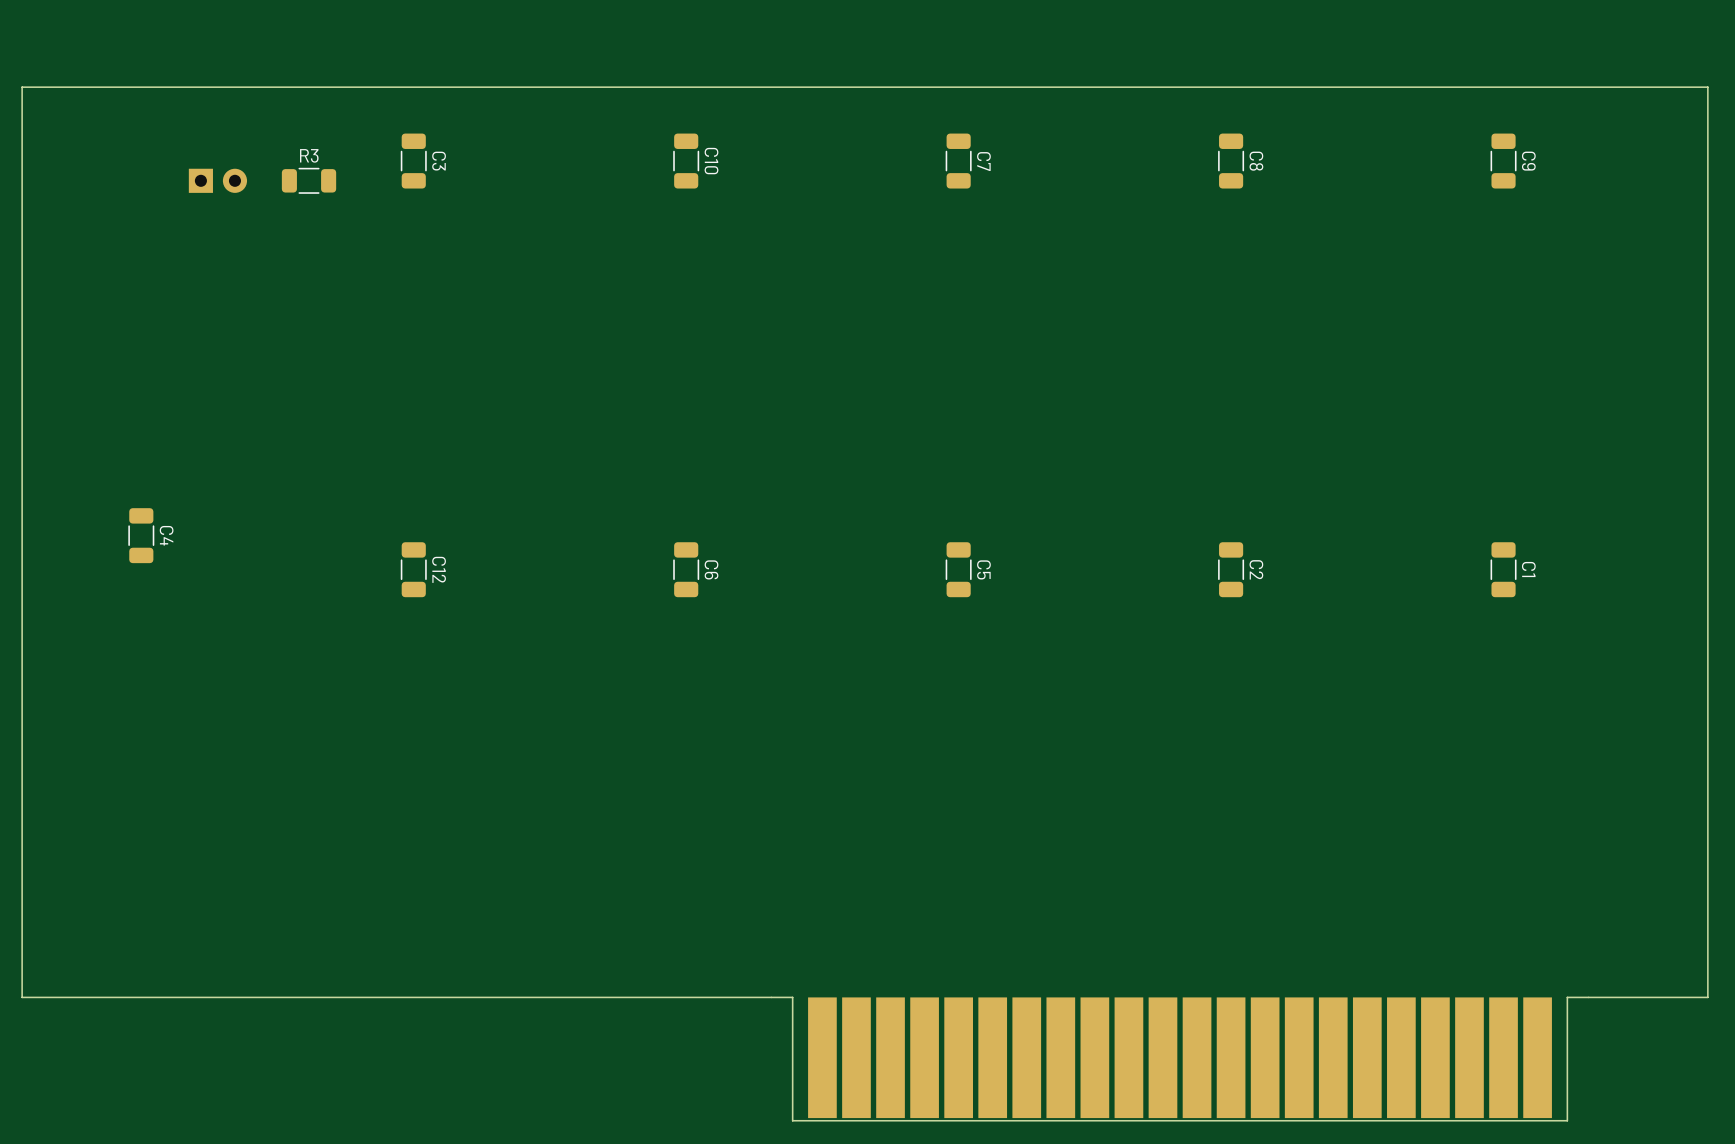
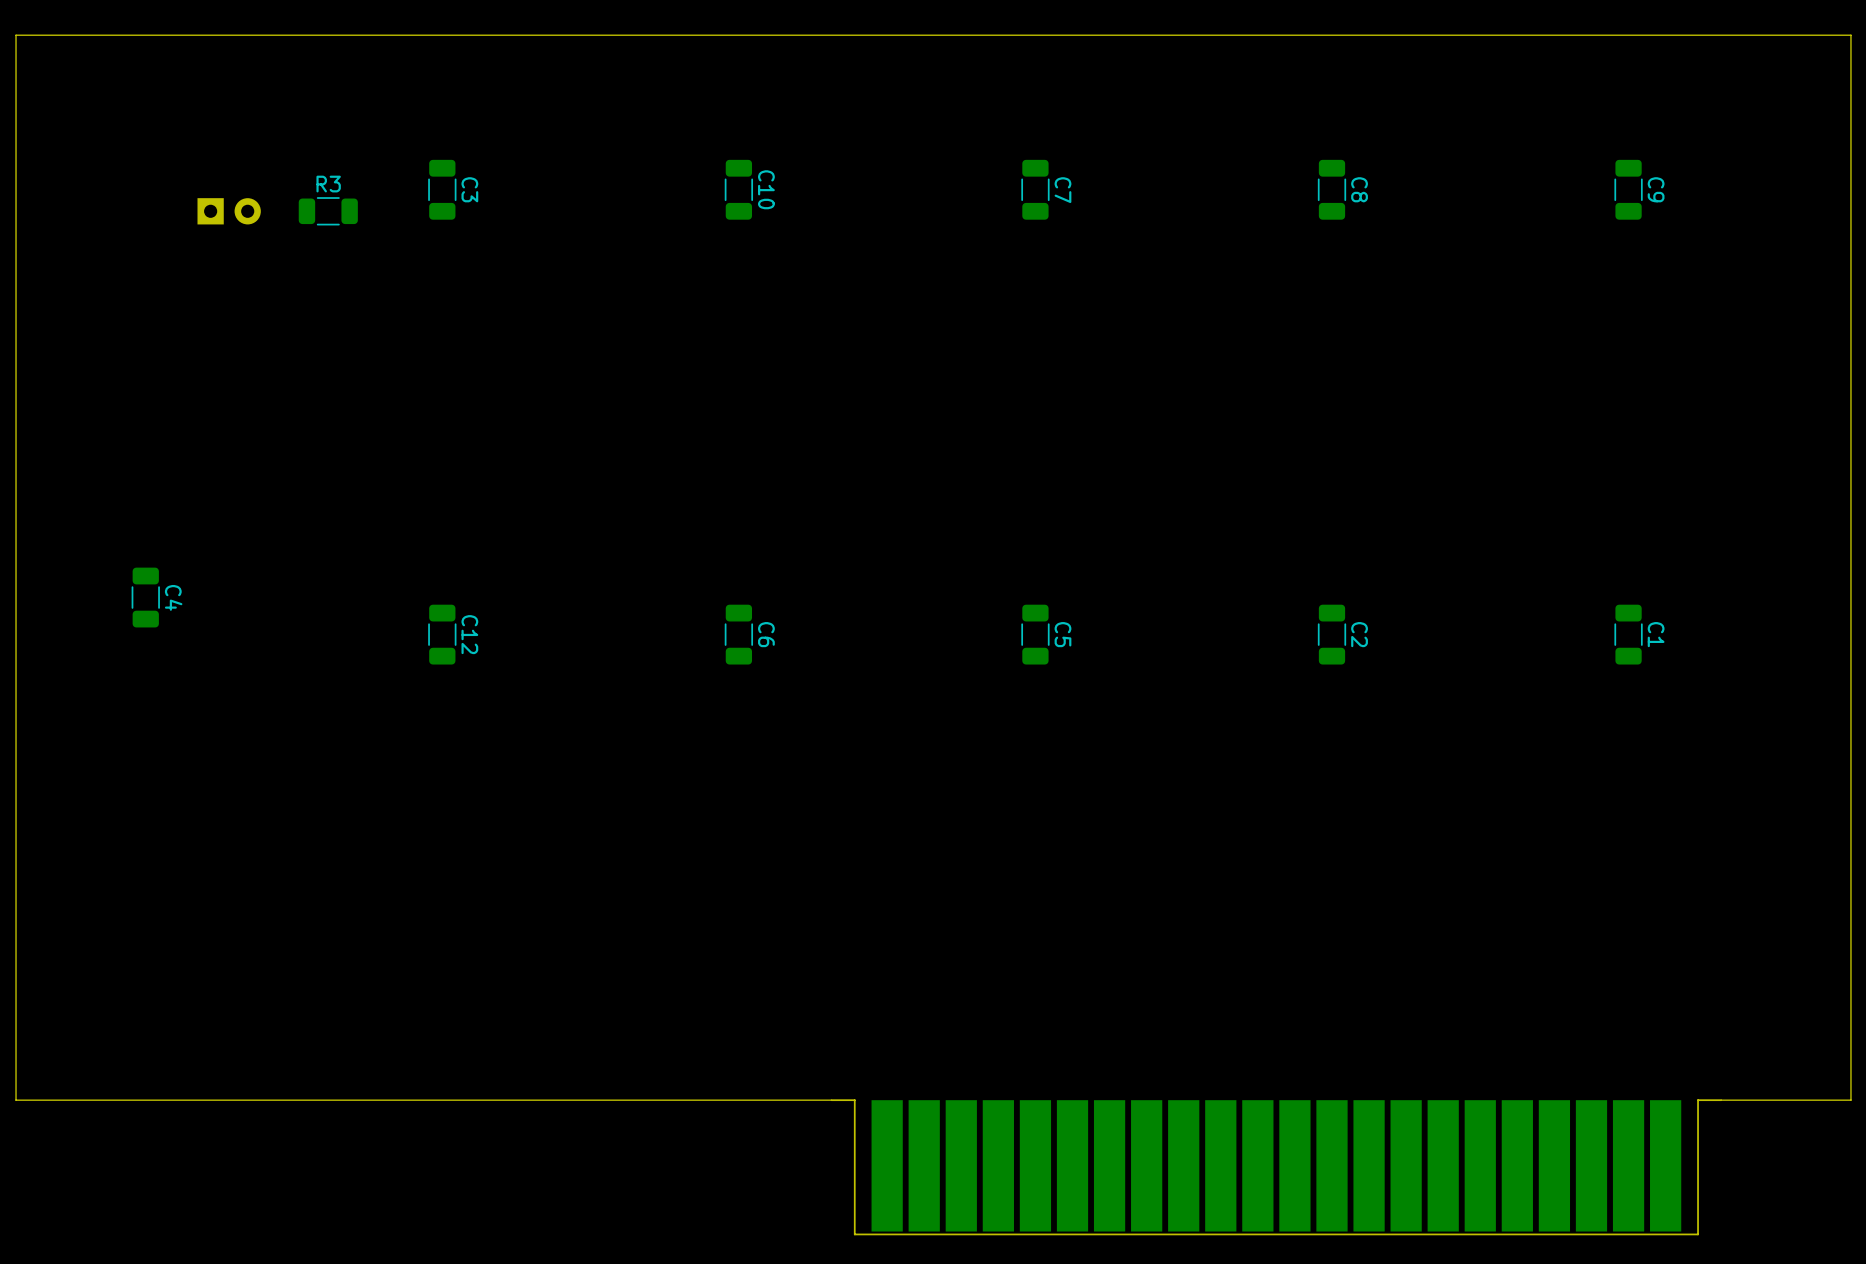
board edge: (1707, 87) (22, 87) -> (1850, 109) (1850, 35) (16, 35) (16, 109)

